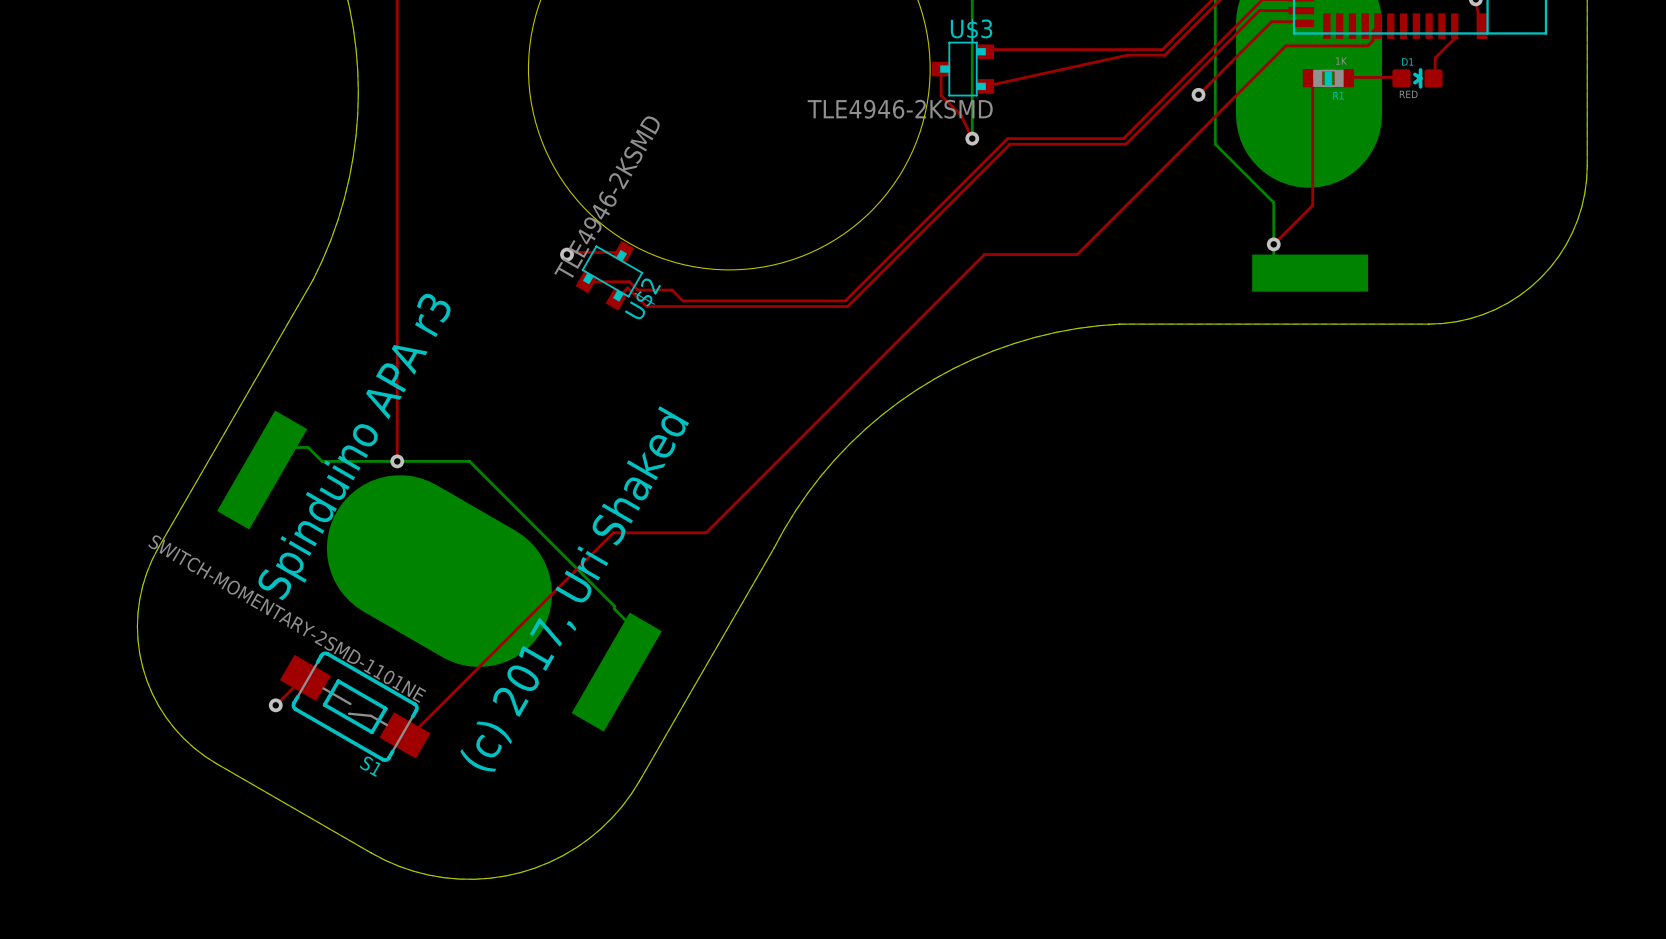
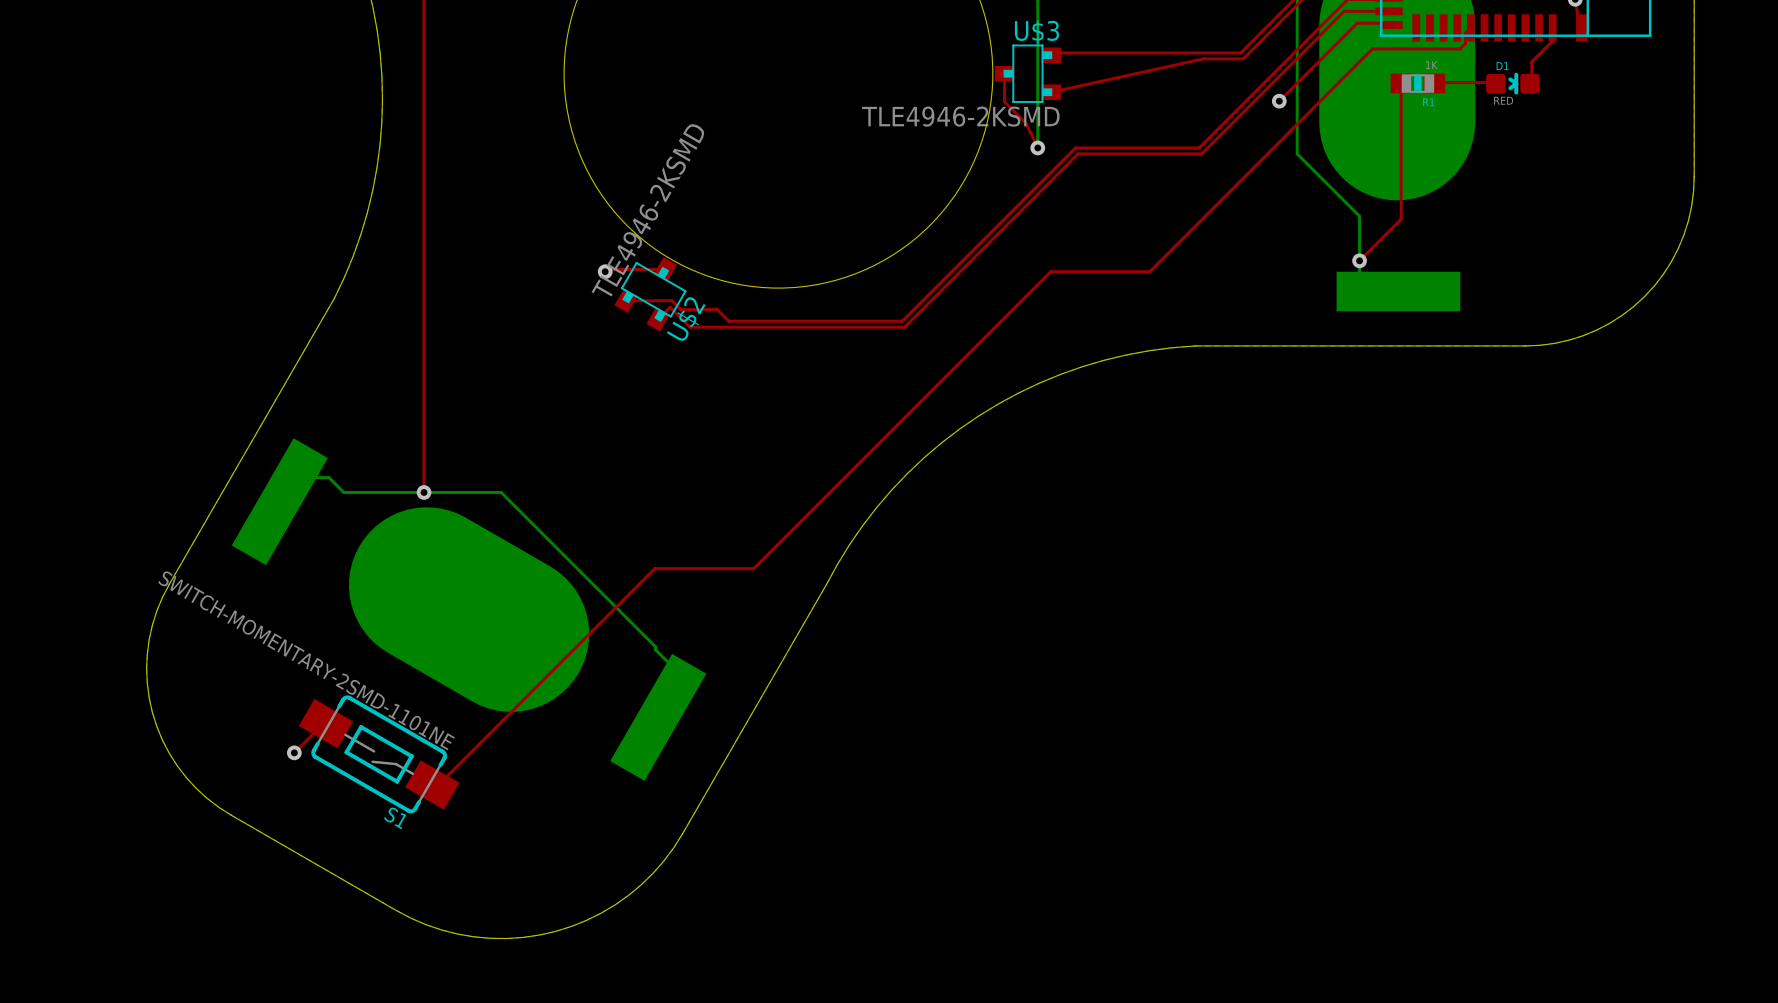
text: Spinduino APA r3 (354, 446) -> none
text: (c) 2017, Uri Shaked (574, 588) -> none

